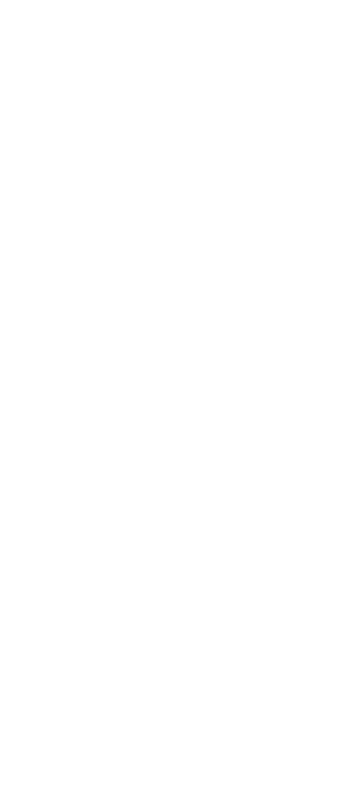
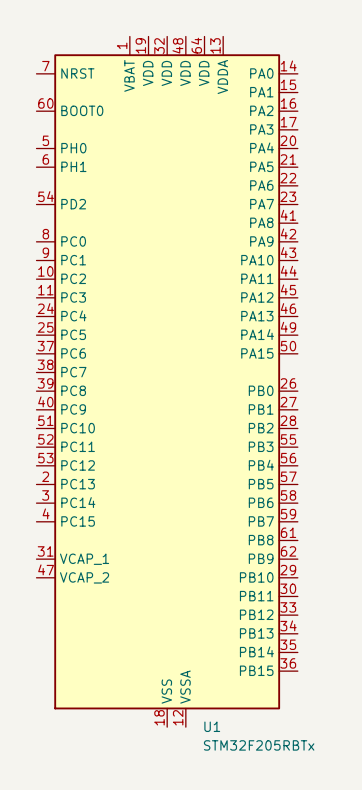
U1: none -> STM32F205RBTx (167, 381)

